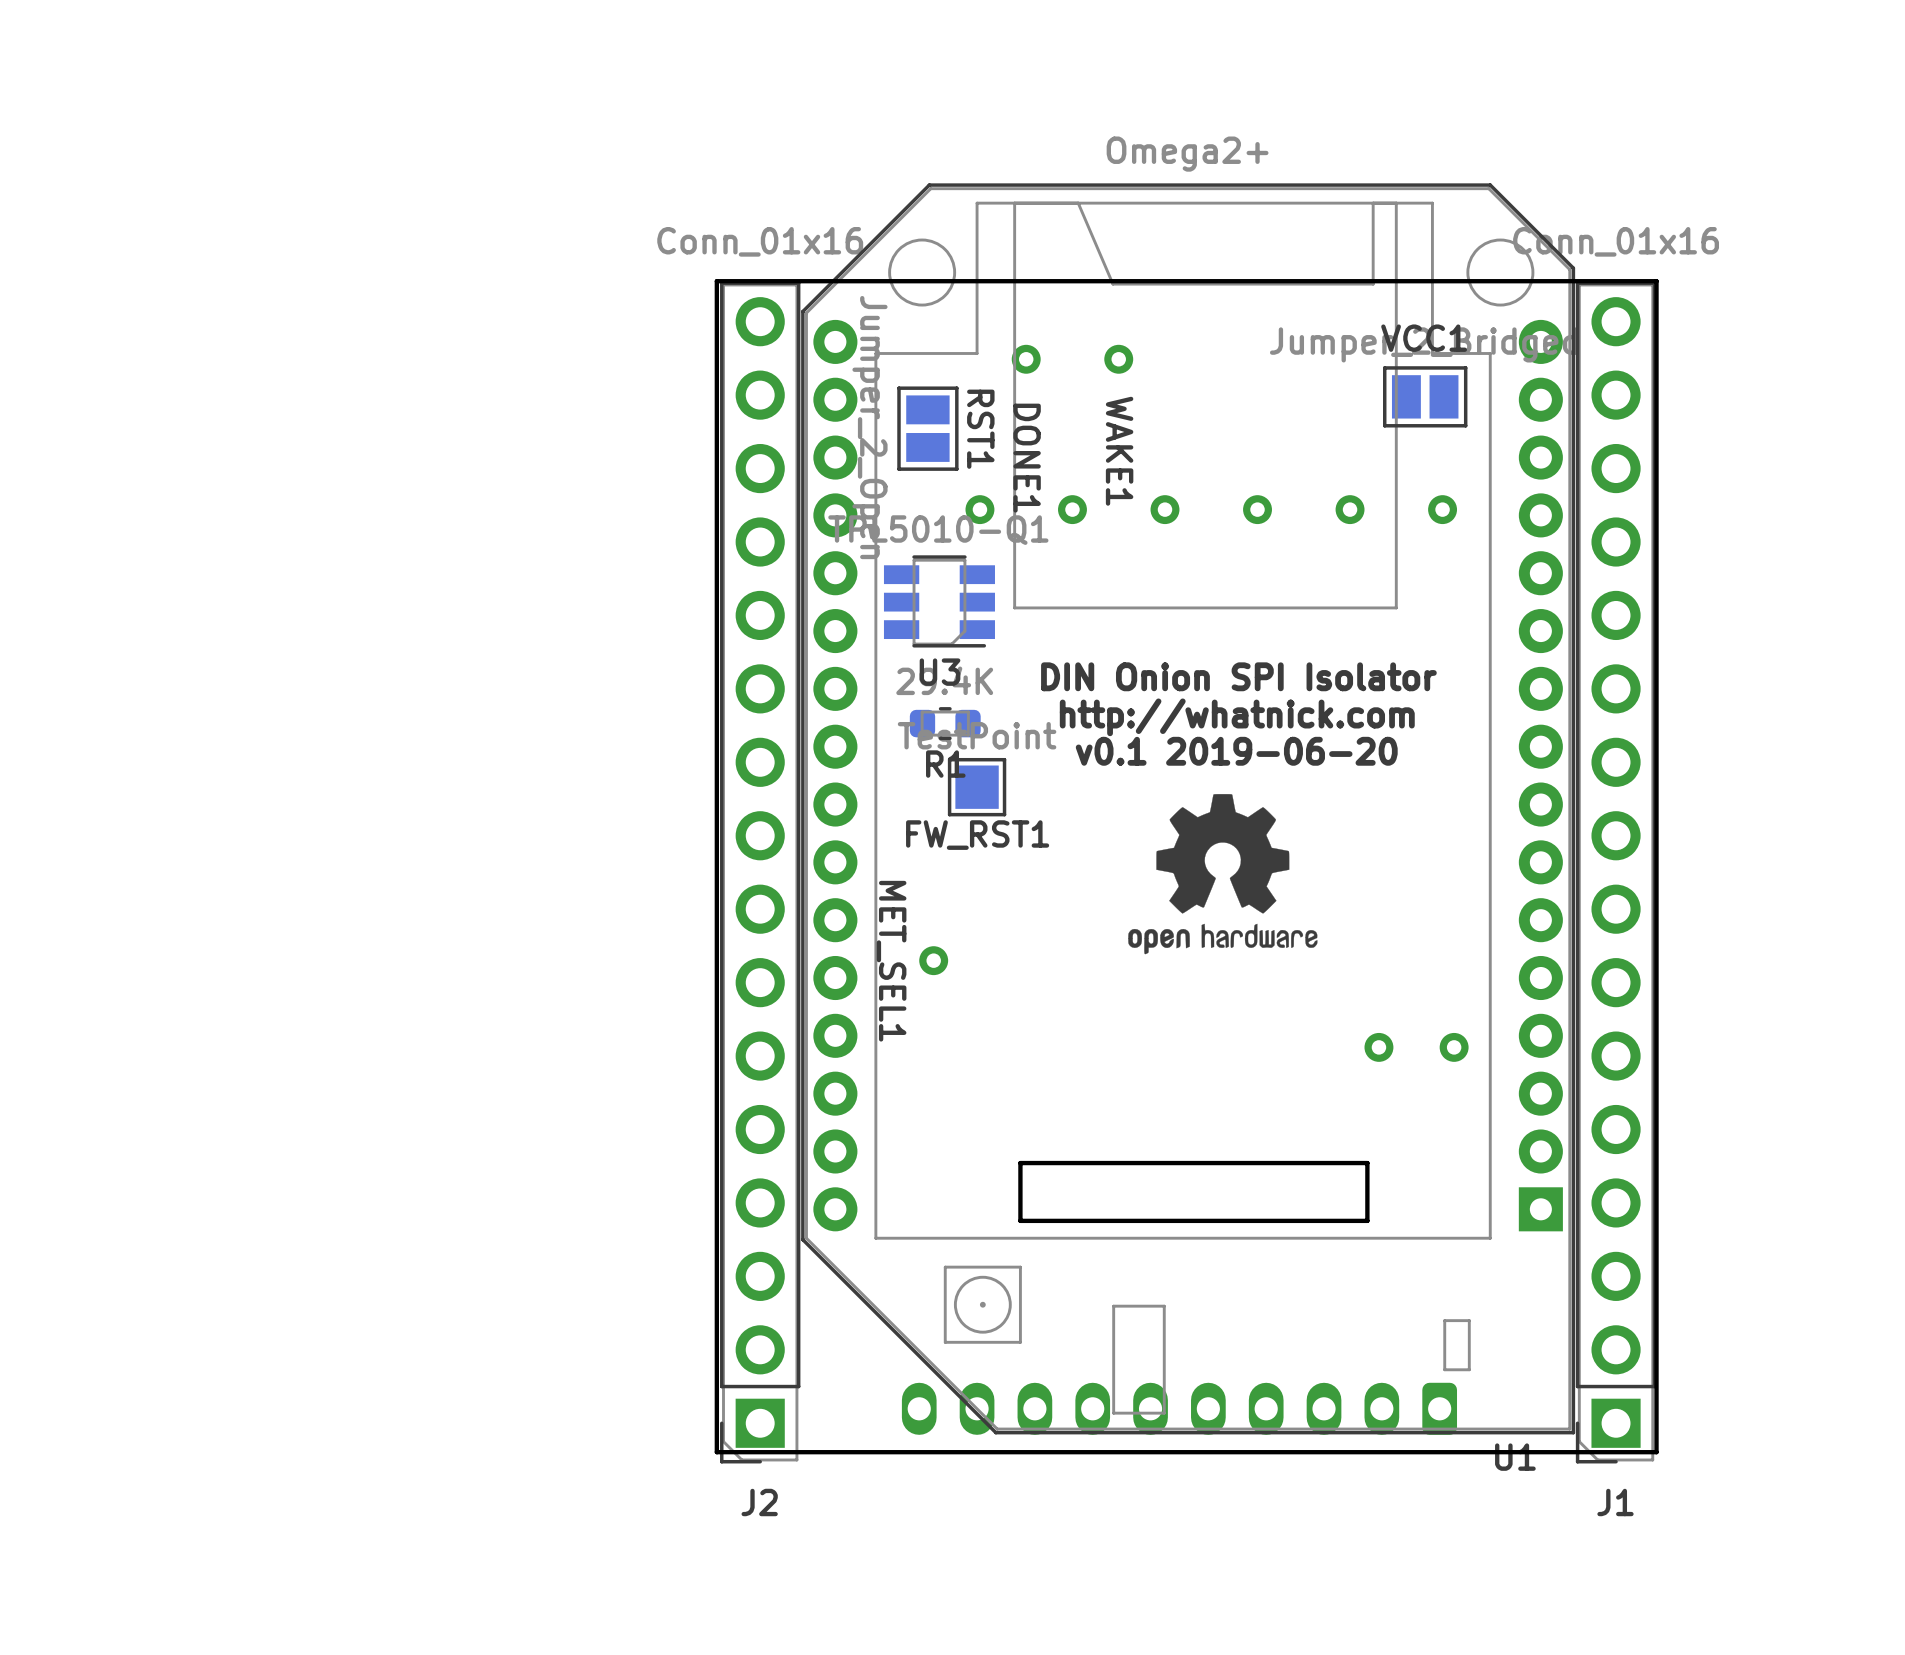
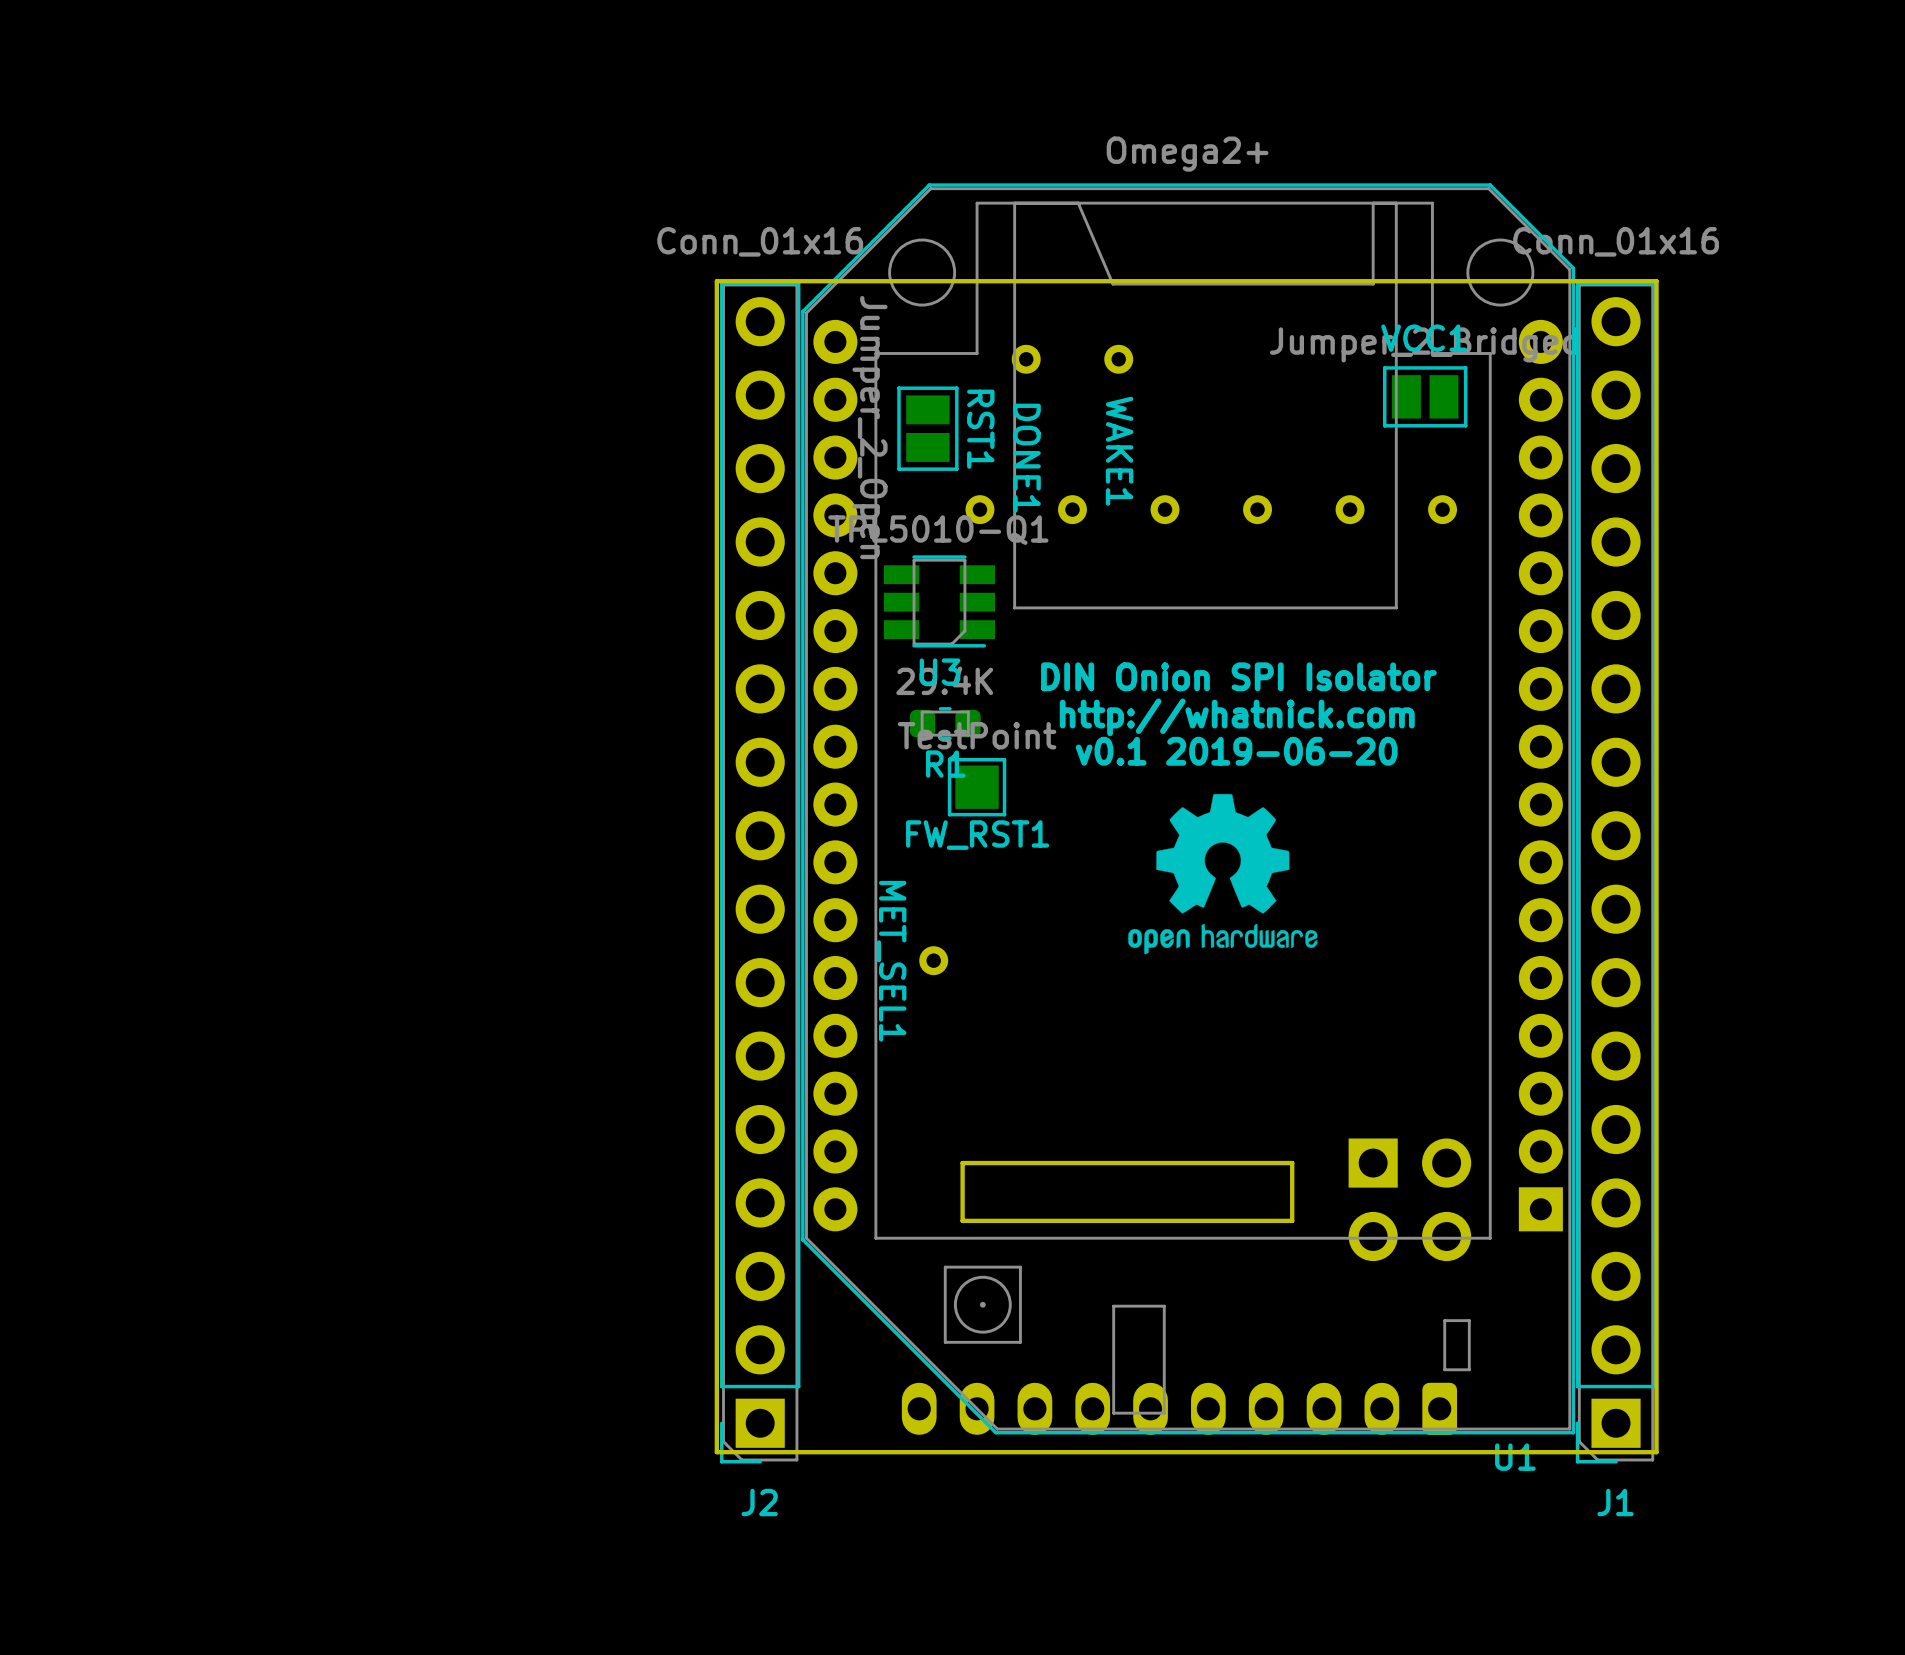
part: (1378, 1047) -> none
part: (1454, 1047) -> none
board edge: (1020, 1163) (1020, 1220) -> (1020, 1163) (962, 1163) (962, 1220) (1020, 1220)
board edge: (1292, 1163) (1367, 1163) (1367, 1220) (1292, 1220) -> (1292, 1163) (1292, 1220)
part: none -> (1409, 1199)

